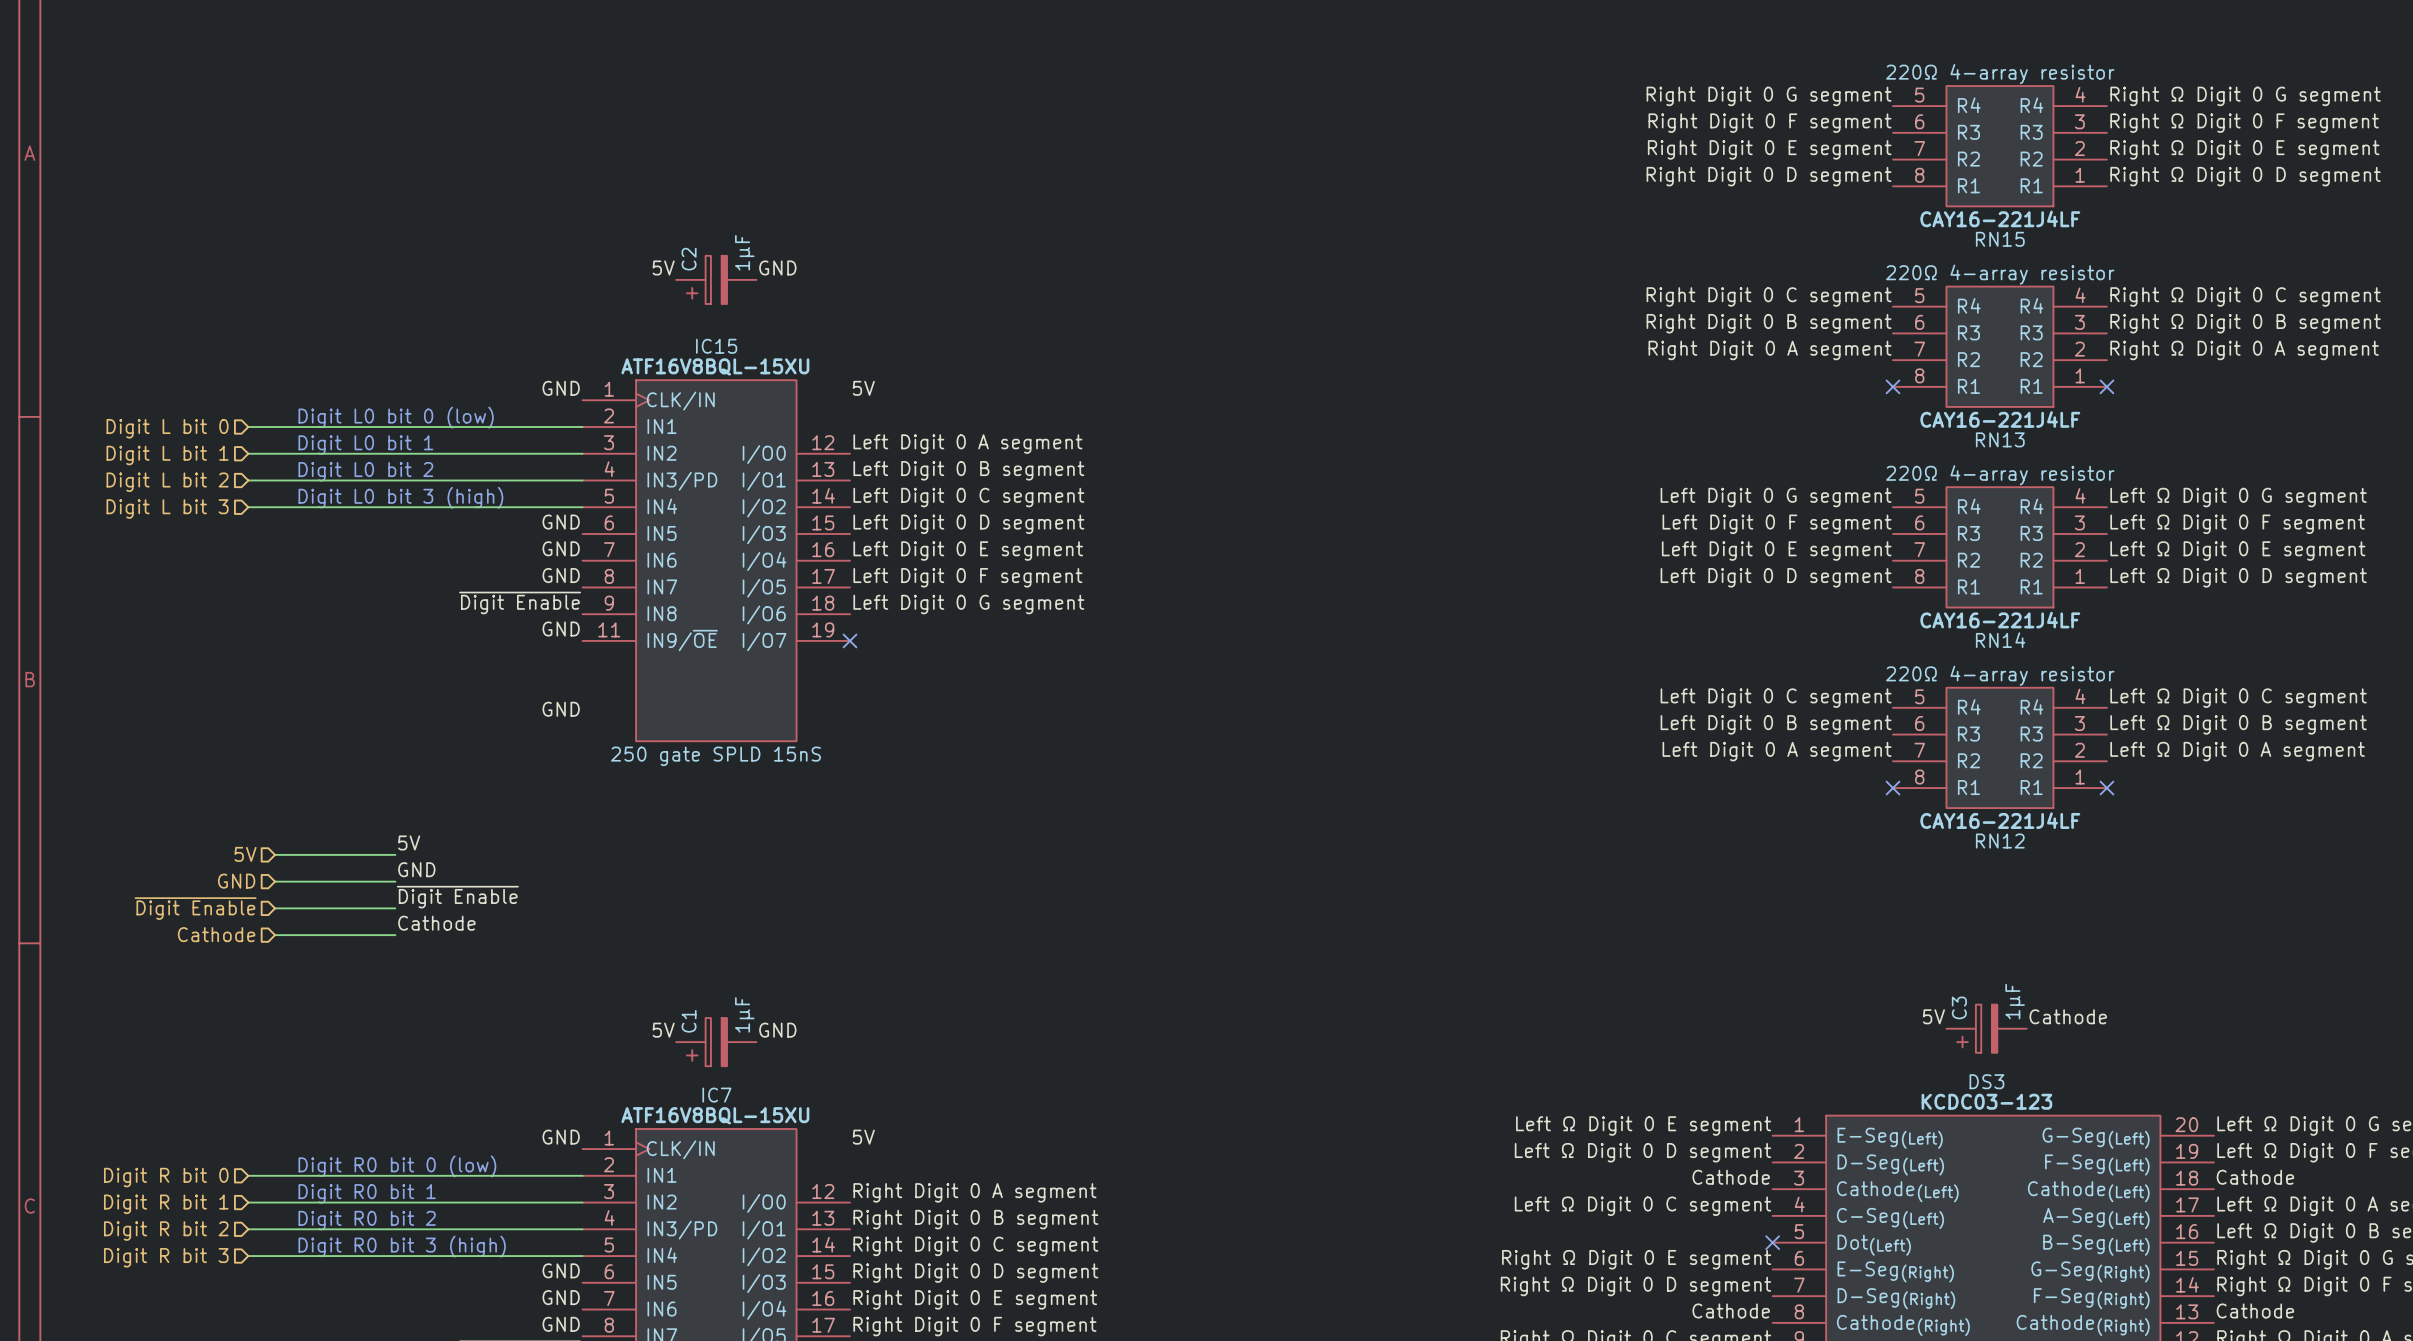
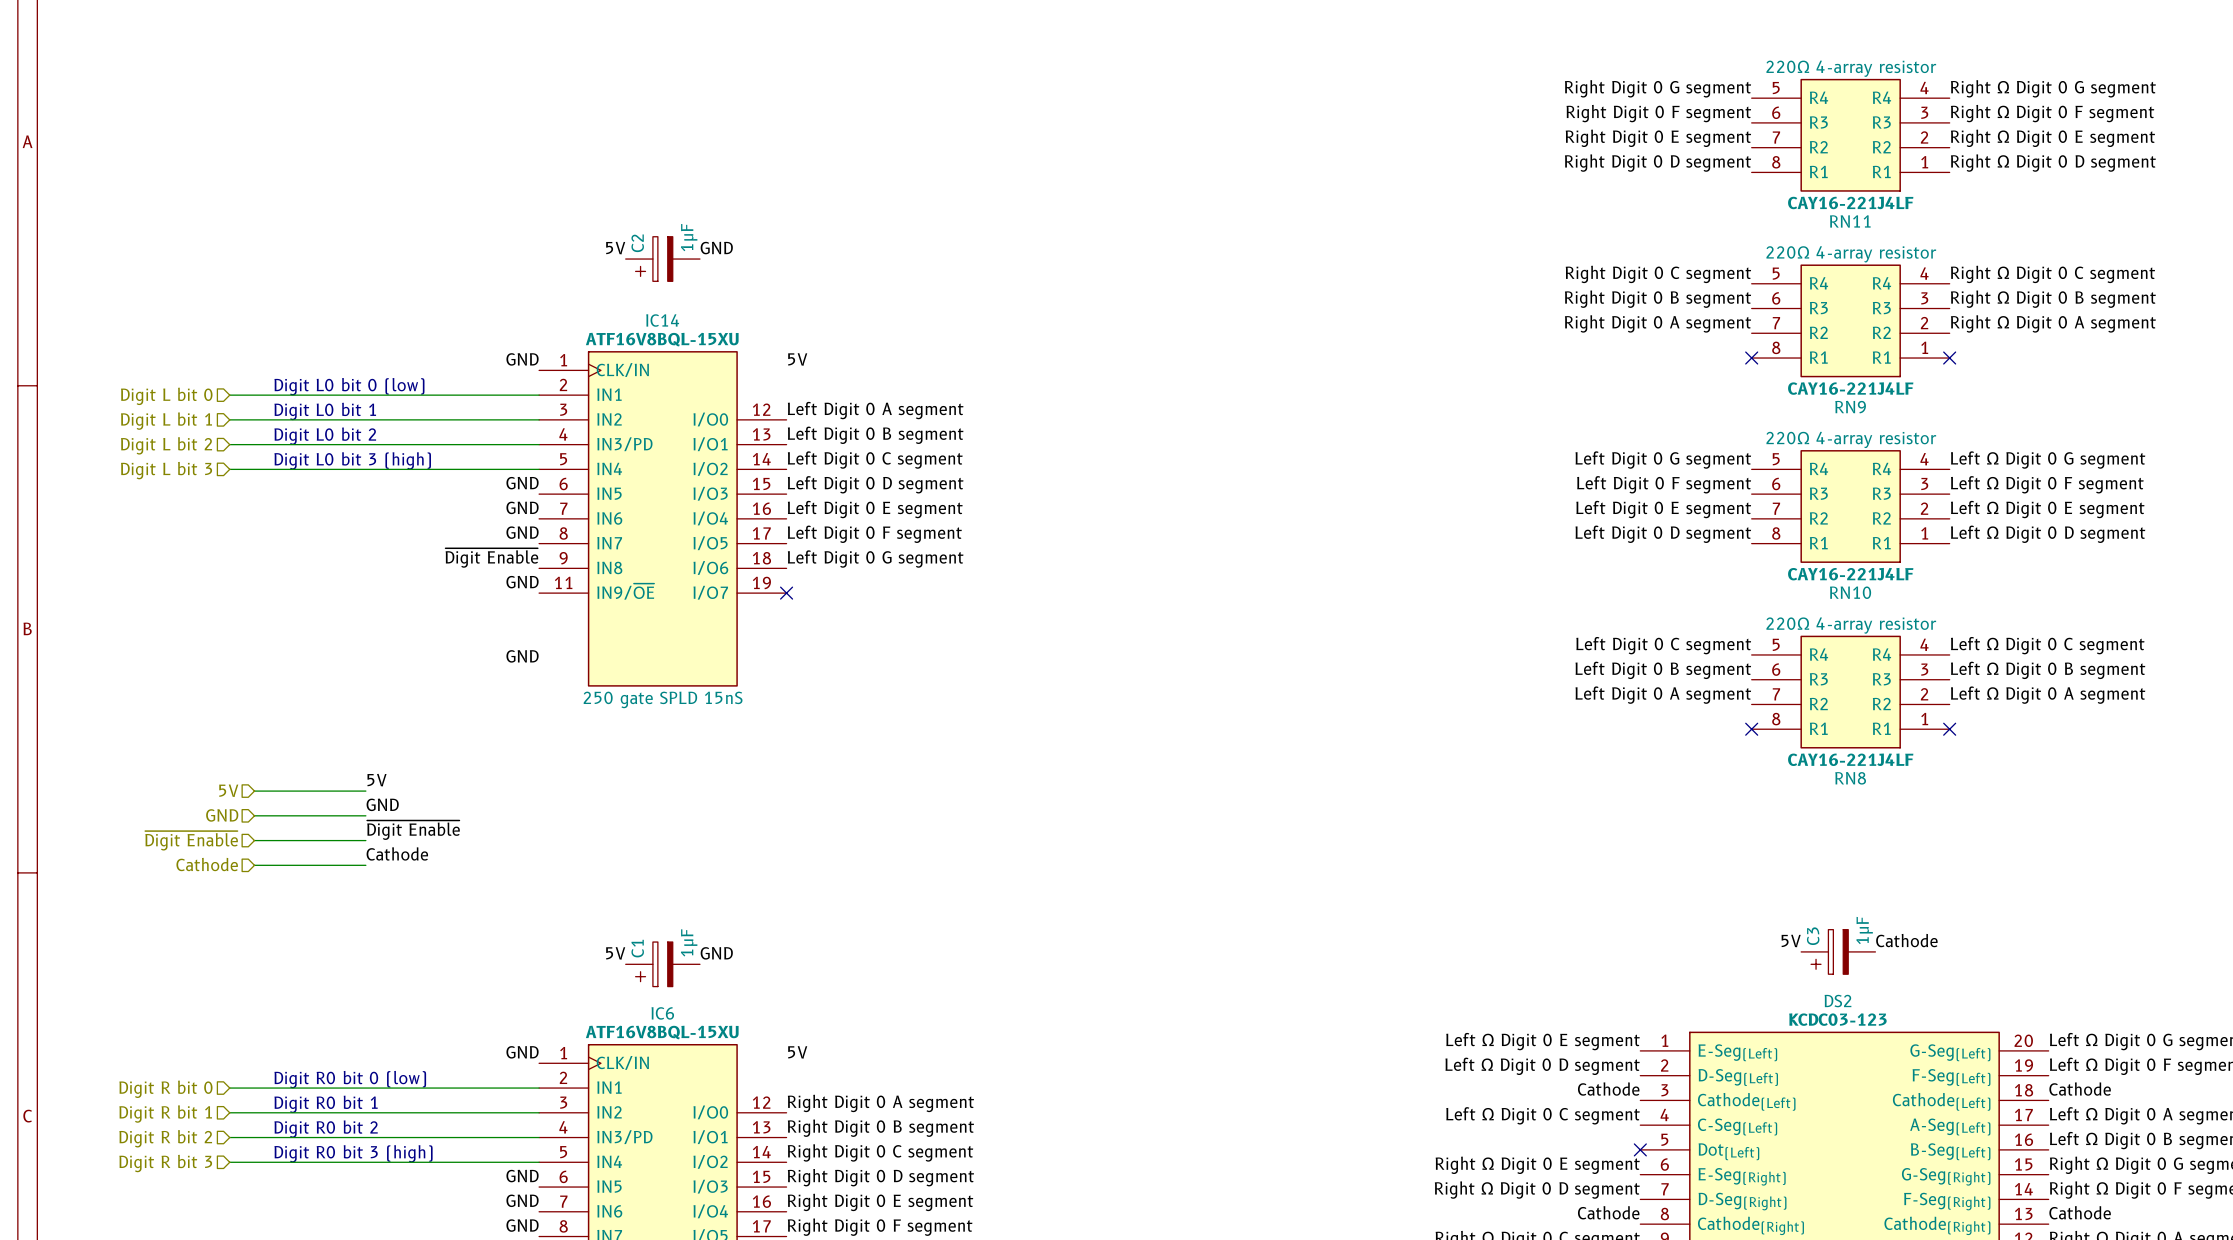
RN15 name: RN15 (2000, 239) -> RN11 (1850, 221)
IC15 name: IC15 (716, 346) -> IC14 (662, 320)
RN13 name: RN13 (2000, 439) -> RN9 (1850, 407)
RN14 name: RN14 (2000, 640) -> RN10 (1850, 592)
RN12 name: RN12 (2000, 841) -> RN8 (1850, 778)
DS3 name: DS3 (1986, 1081) -> DS2 (1838, 1001)
IC7 name: IC7 (716, 1095) -> IC6 (662, 1013)

